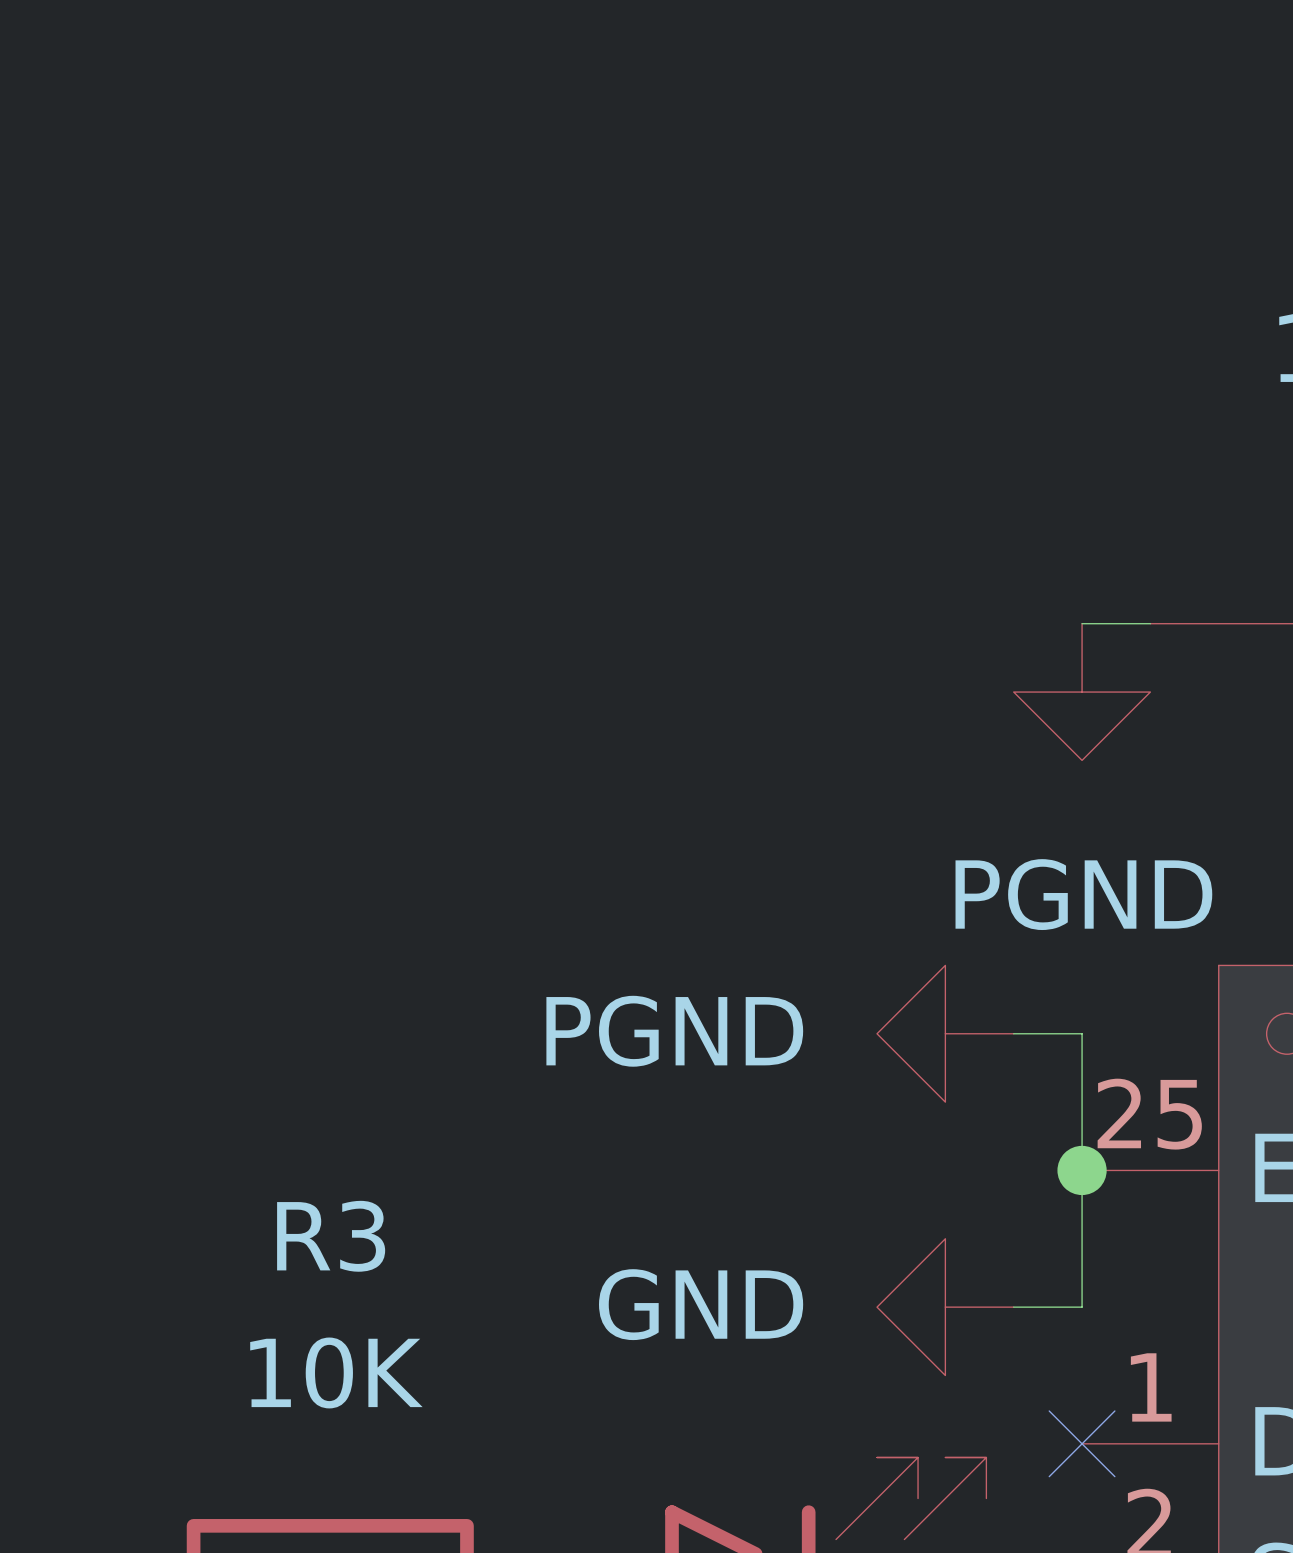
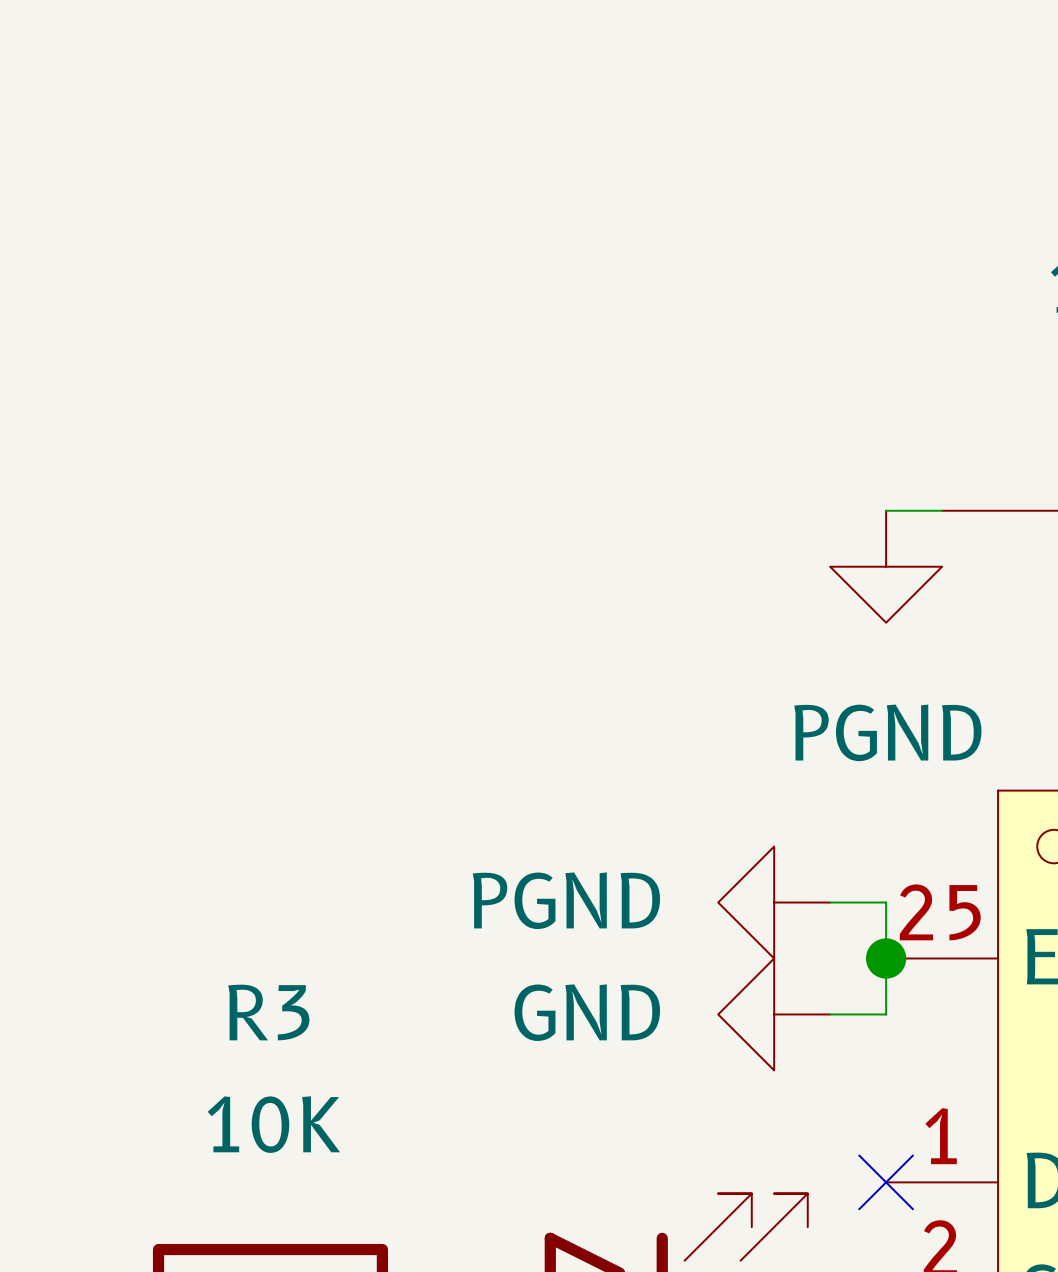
power symbol position: PGND (945, 1033) -> PGND (774, 902)
wire: (1013, 1033) (1082, 1033) (1082, 1102) -> (830, 902) (886, 902)
wire: (1082, 1238) (1082, 1307) (1013, 1307) -> (886, 1014) (830, 1014)
power symbol position: GND (945, 1307) -> GND (774, 1014)

